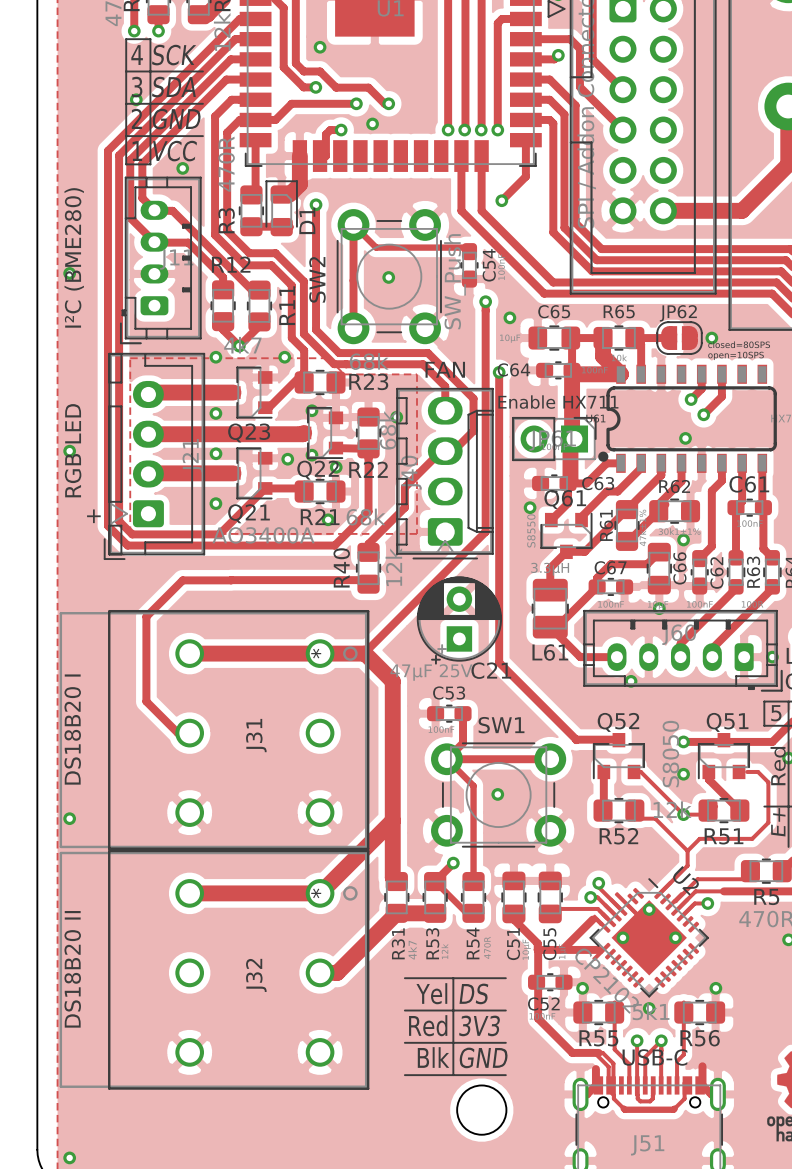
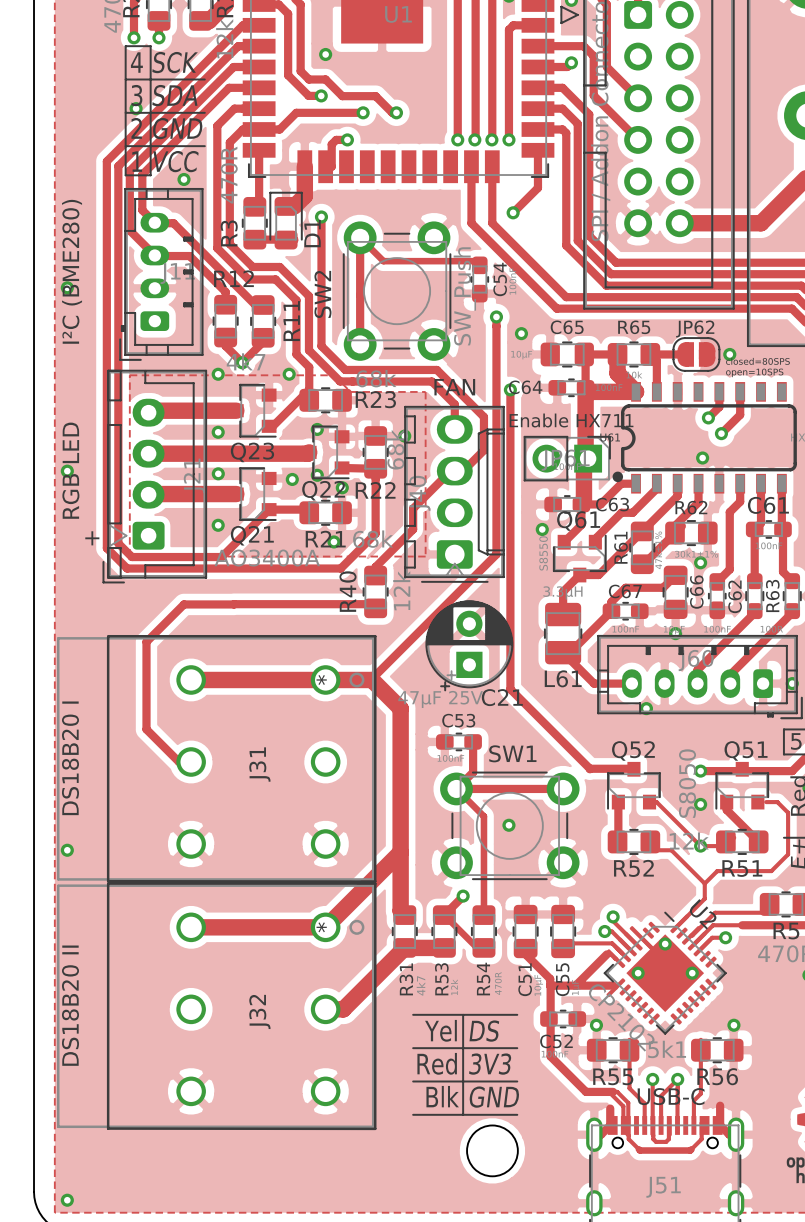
via: (372, 123) -> none
via: (388, 277) -> none
via: (649, 1008) -> none

